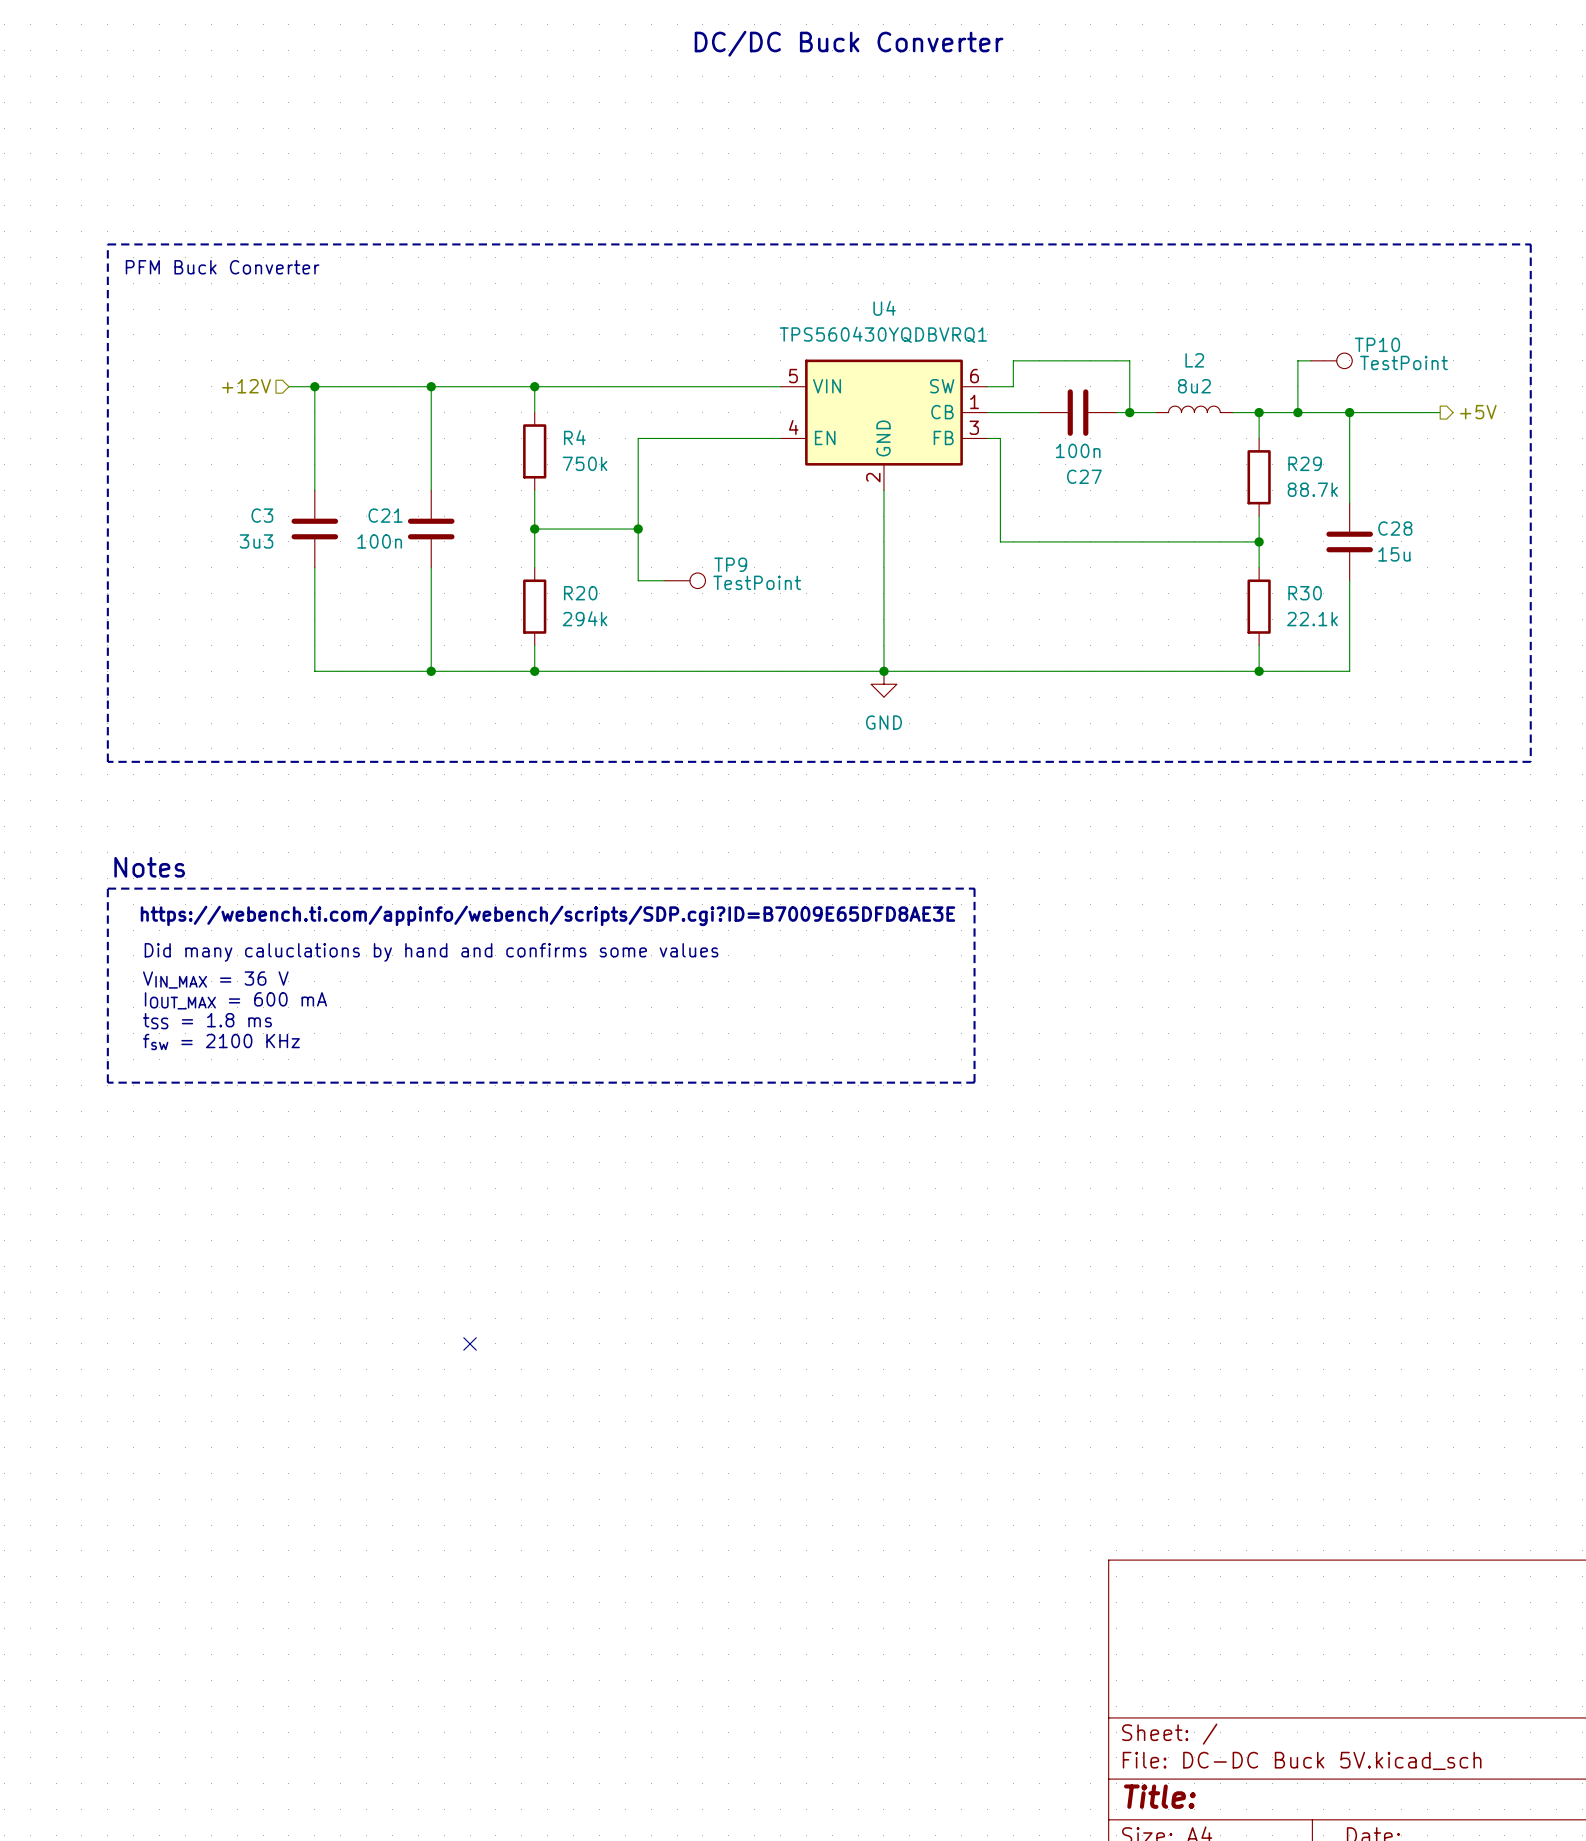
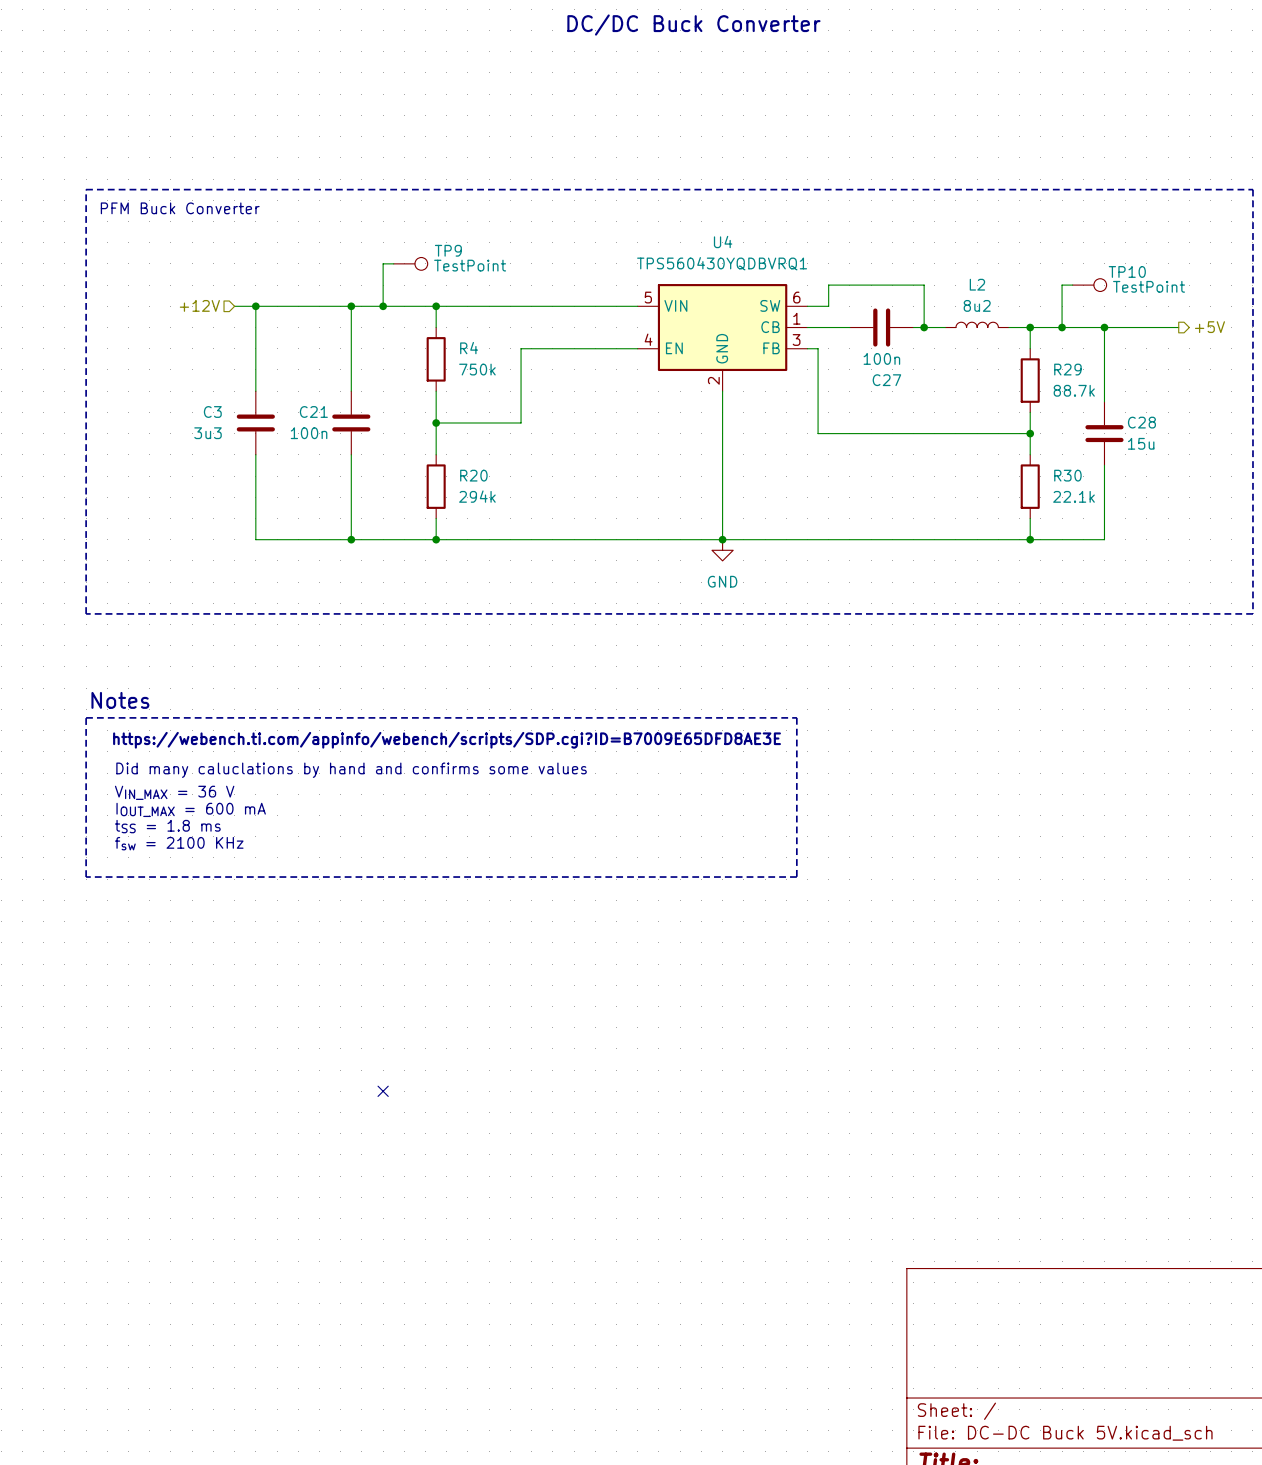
wire: none -> (393, 263) (383, 263) (383, 306)
junction: none -> (383, 306)
wire: (638, 529) (638, 580) (664, 580) -> none
junction: (638, 529) -> none
TP9 position: (684, 580) -> (410, 263)

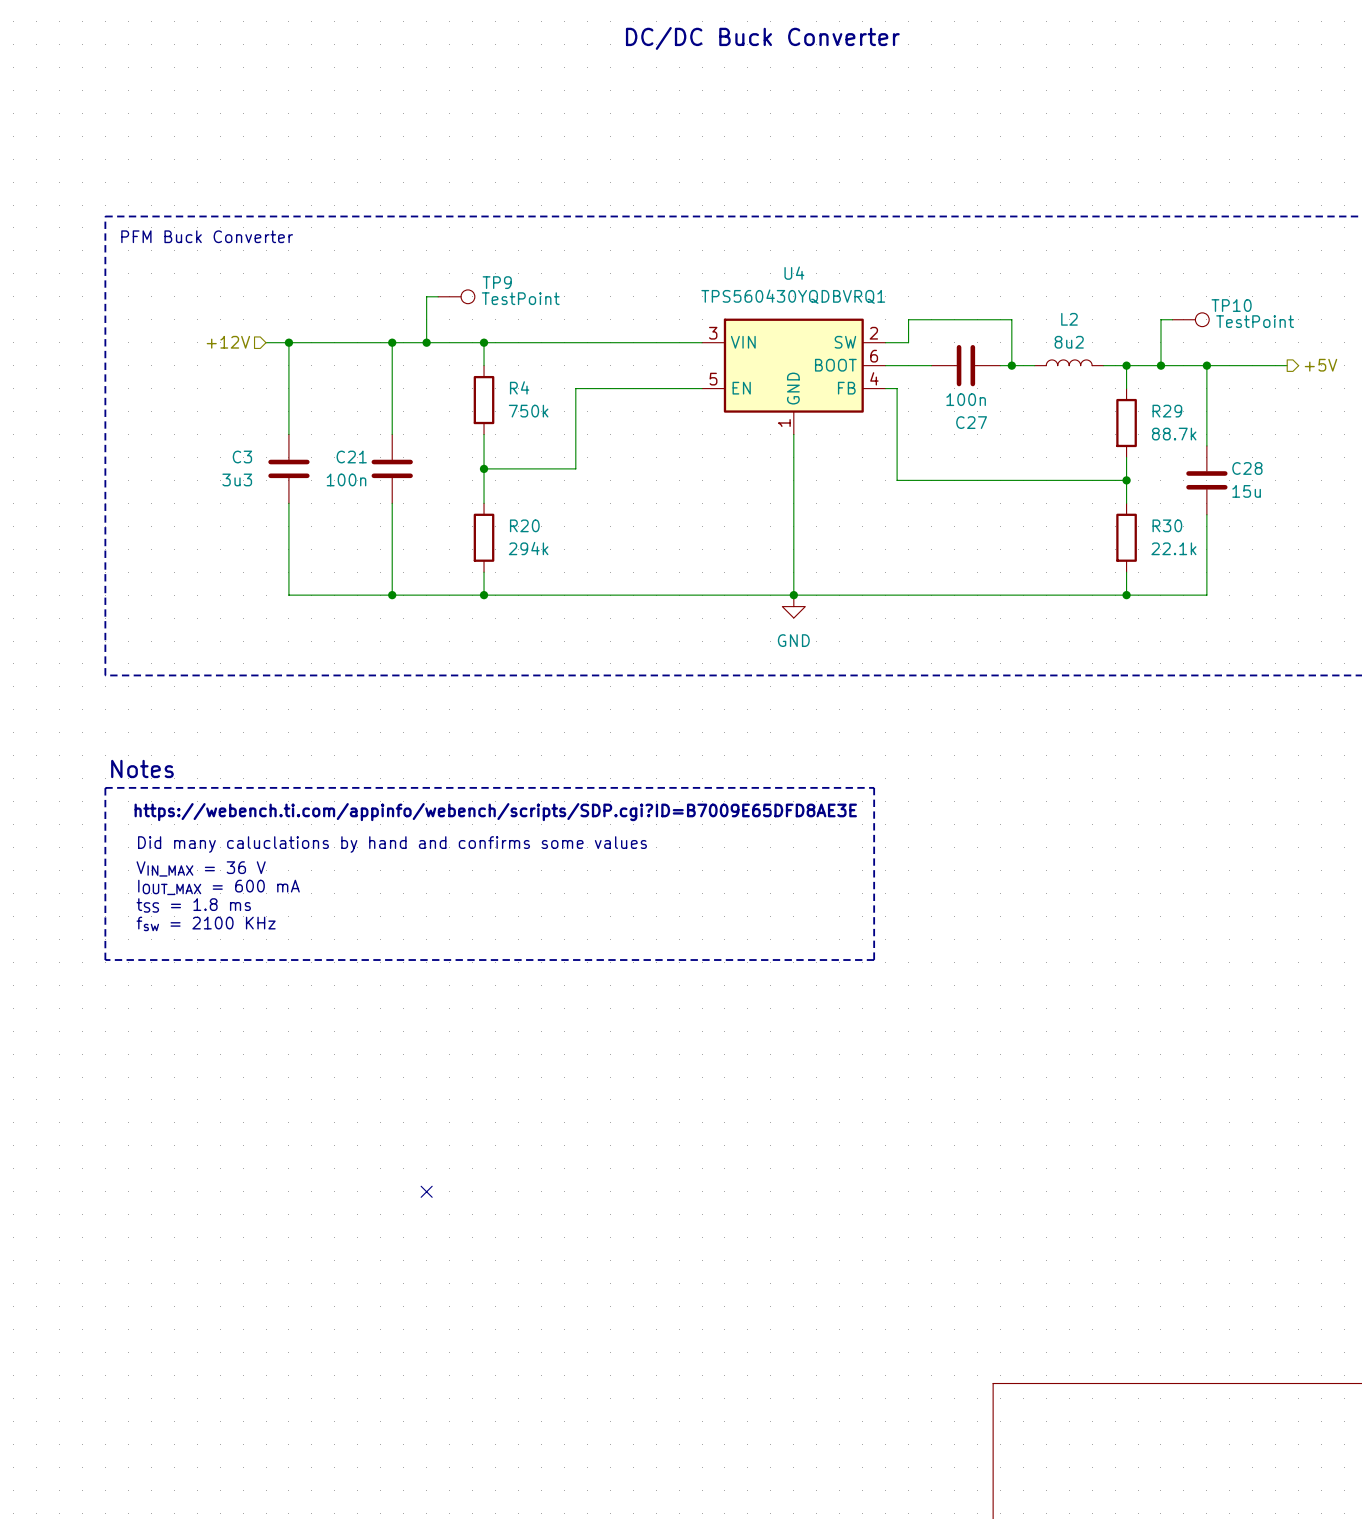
U4 pin number: 5 (648, 297) -> 3 (713, 333)
U4 pin number: 6 (796, 297) -> 2 (873, 333)
U4 pin number: 1 (796, 318) -> 6 (874, 356)
U4 pin name: CB (770, 327) -> BOOT (835, 365)
U4 pin number: 4 (648, 339) -> 5 (713, 379)
U4 pin number: 3 (796, 339) -> 4 (874, 378)
U4 pin number: 2 (713, 380) -> 1 (784, 423)

